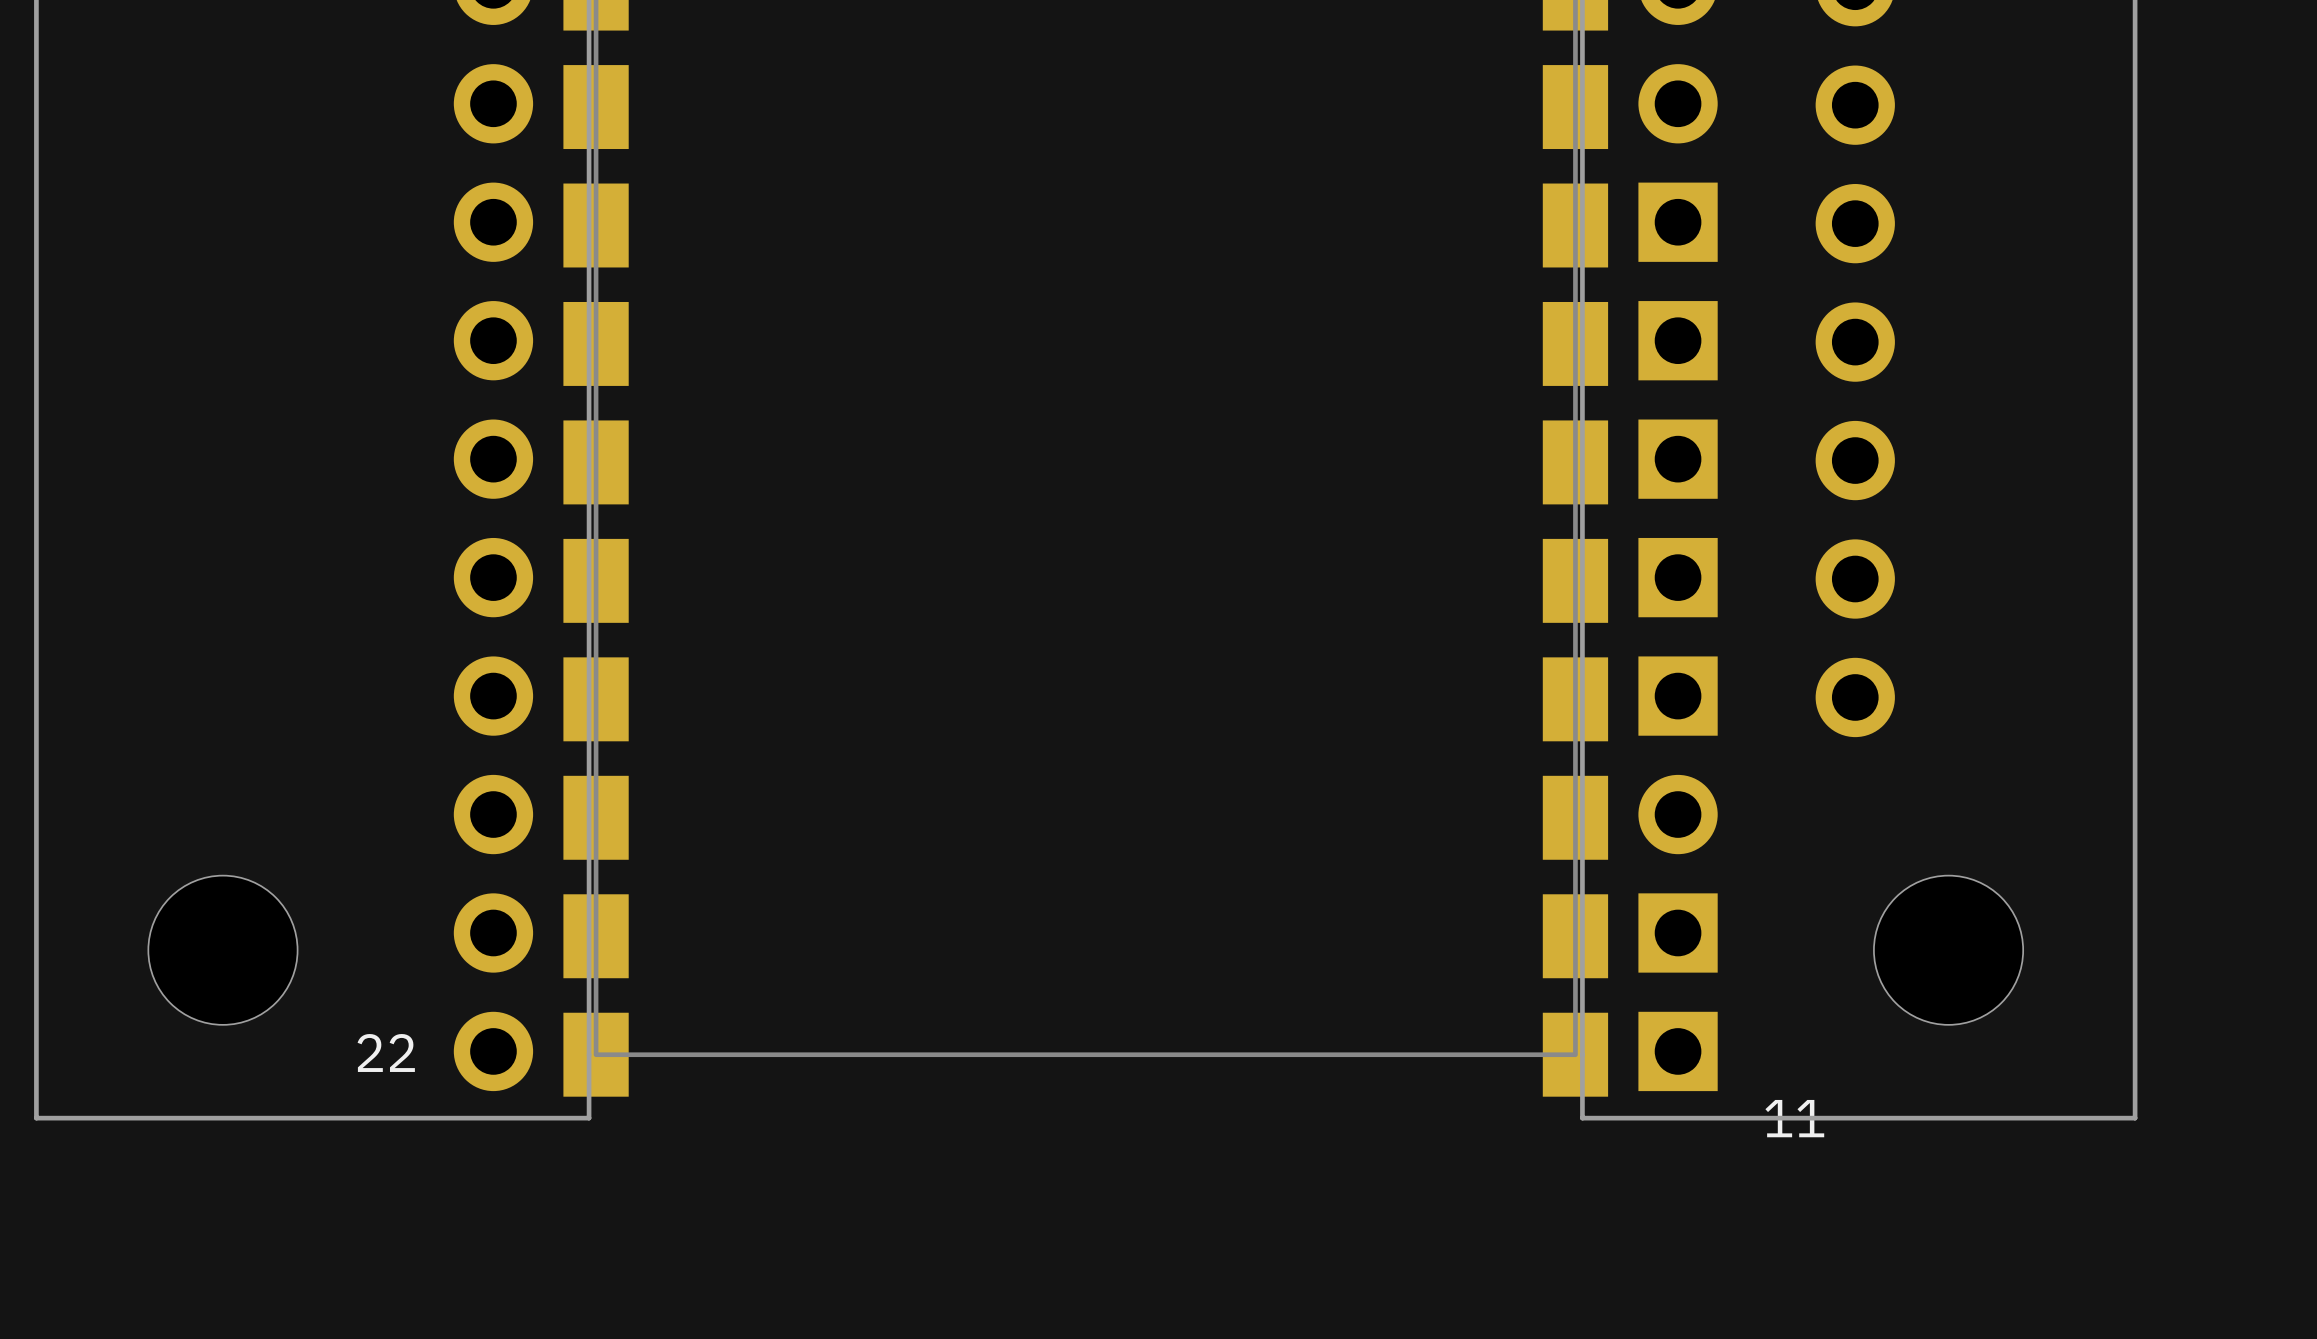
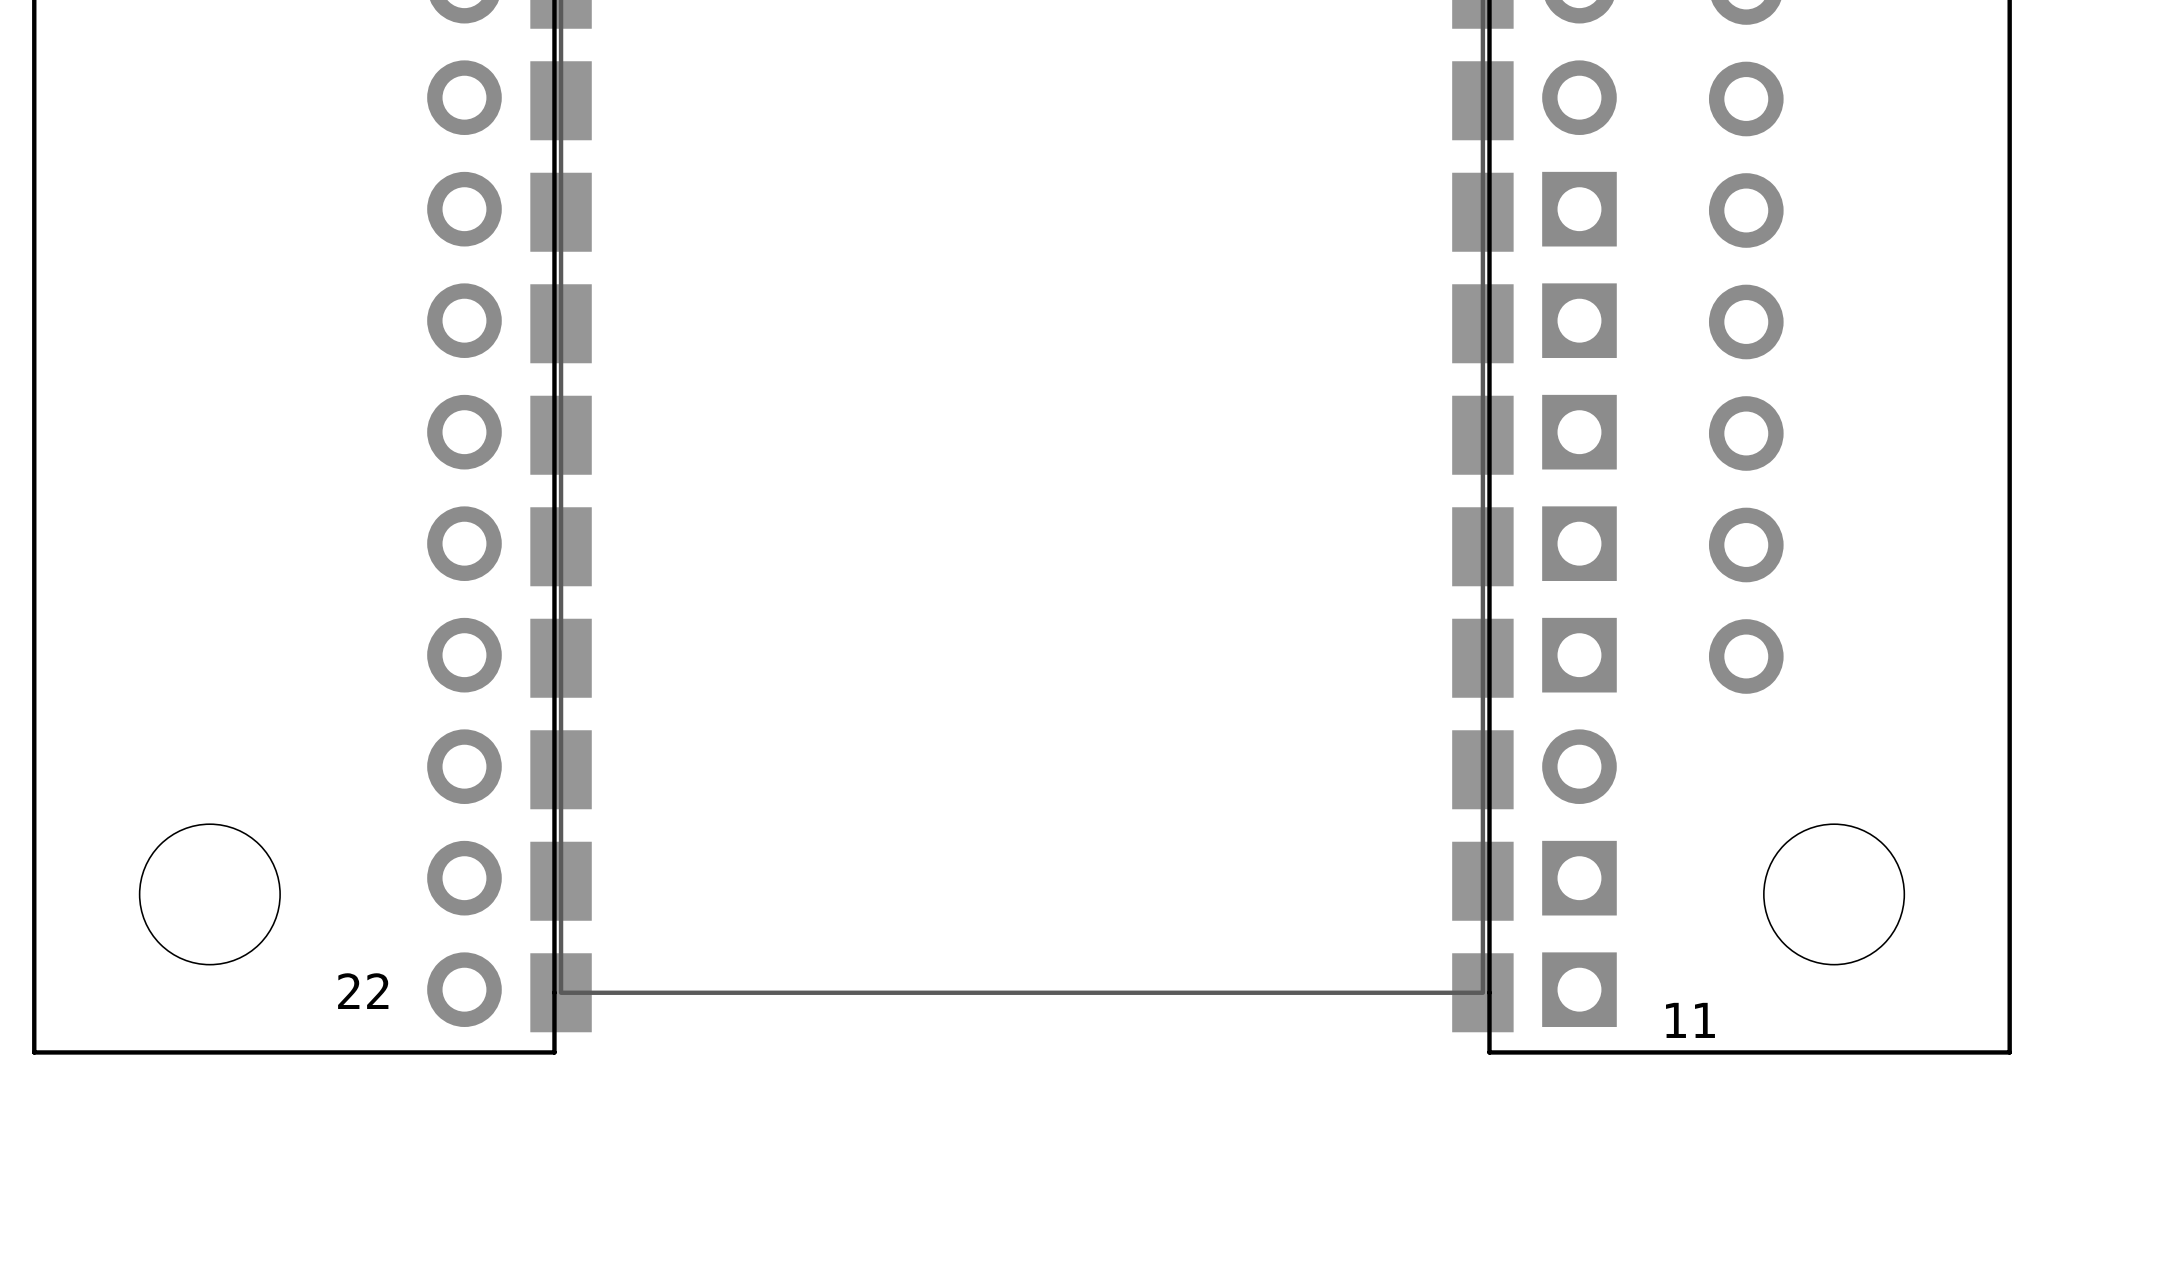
part text position: 11 (1794, 1118) -> 11 (1690, 1020)

